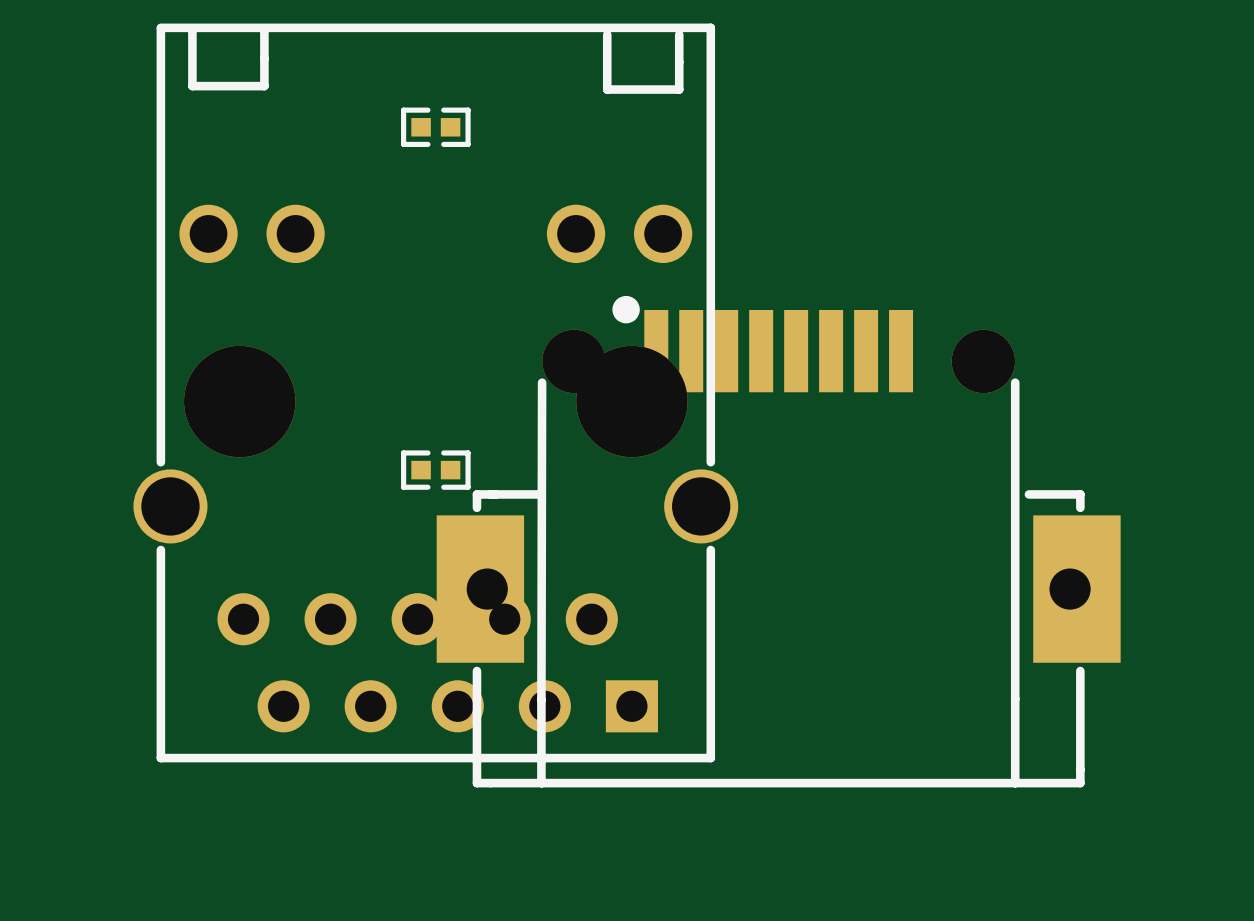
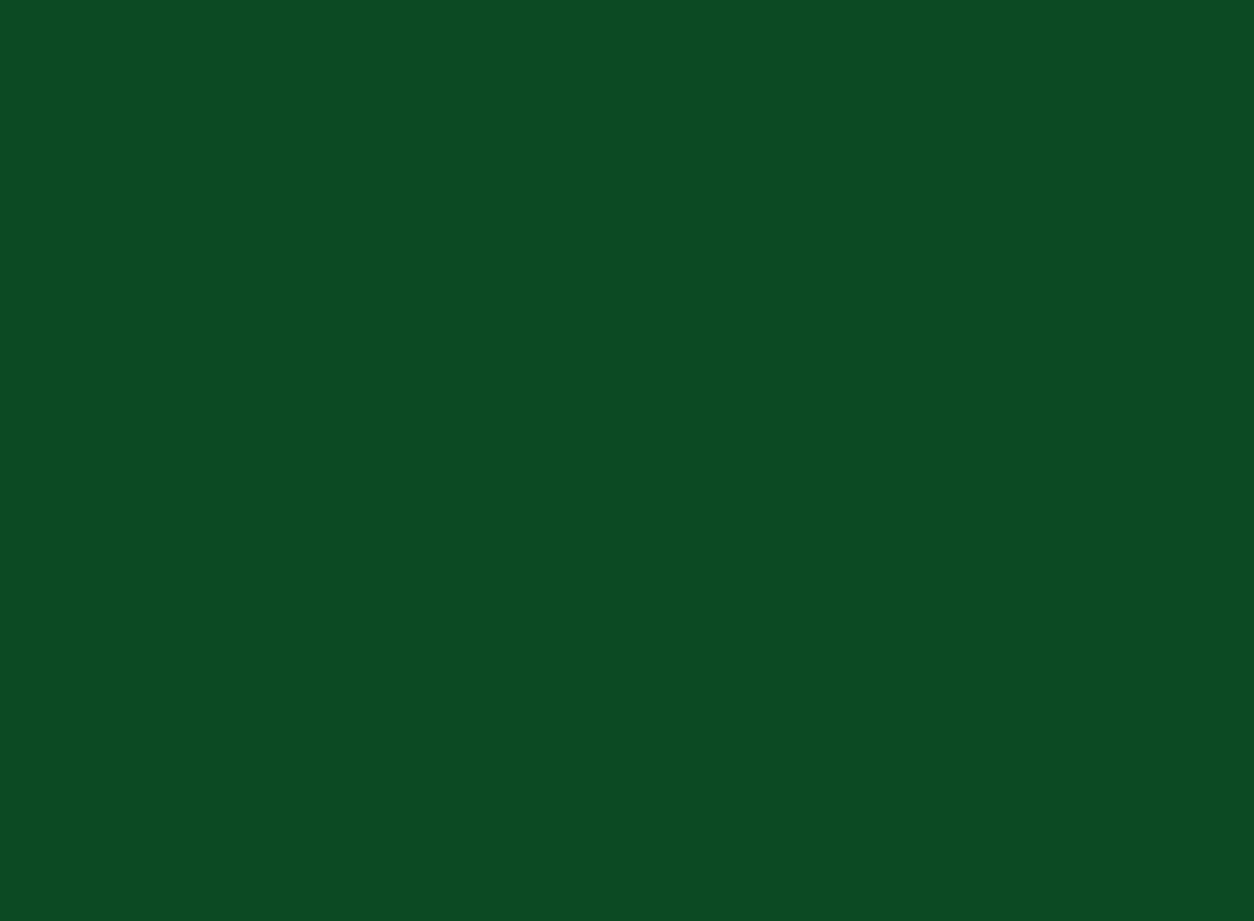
part: (435, 127) -> none
part: (435, 392) -> none
part: (435, 470) -> none
part: (778, 541) -> none

